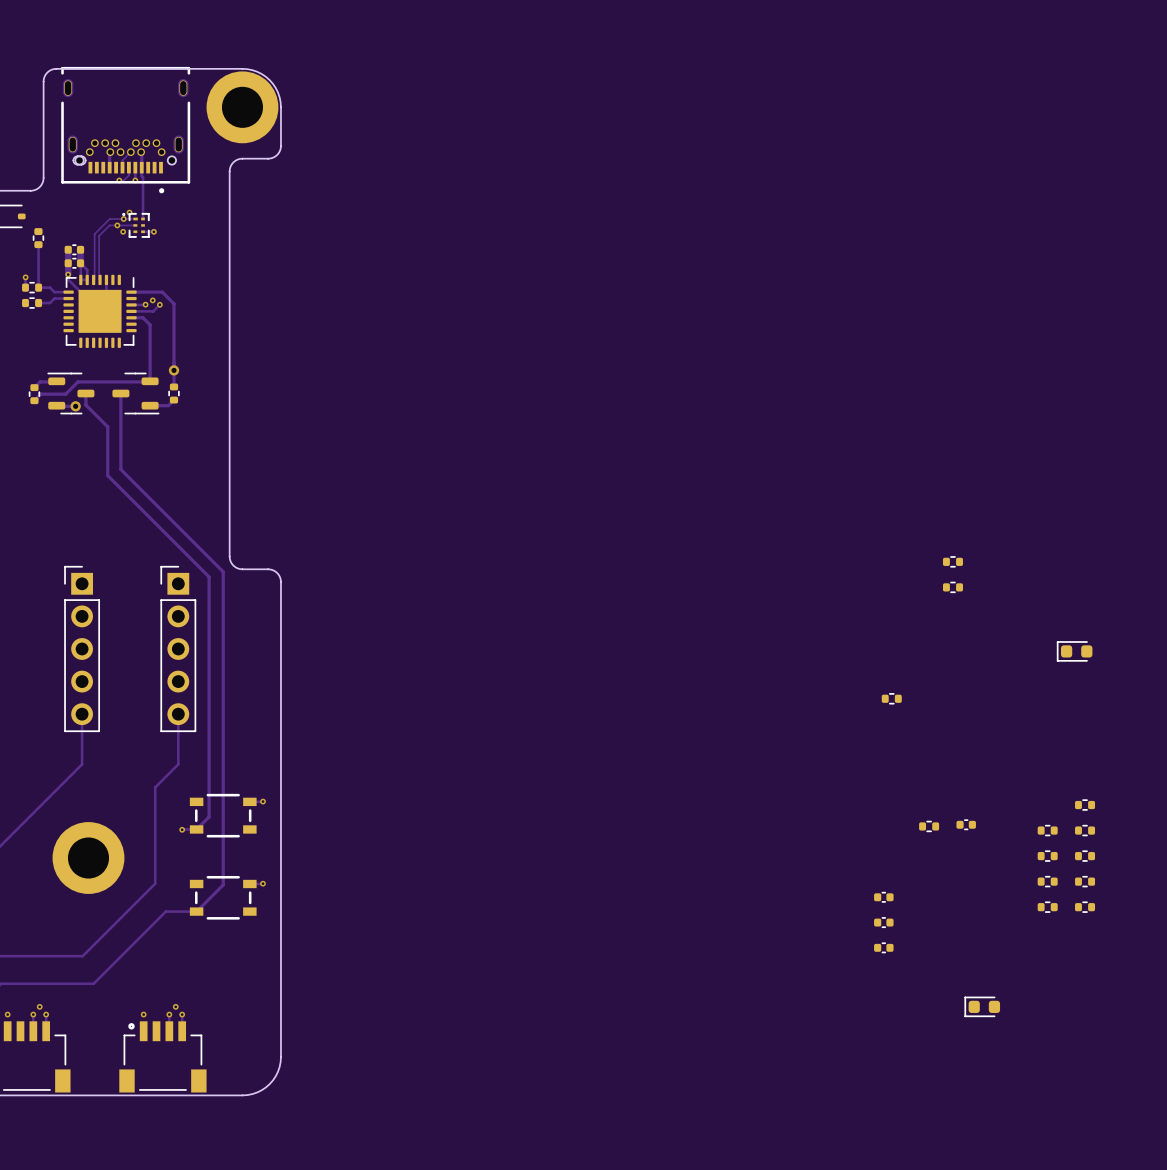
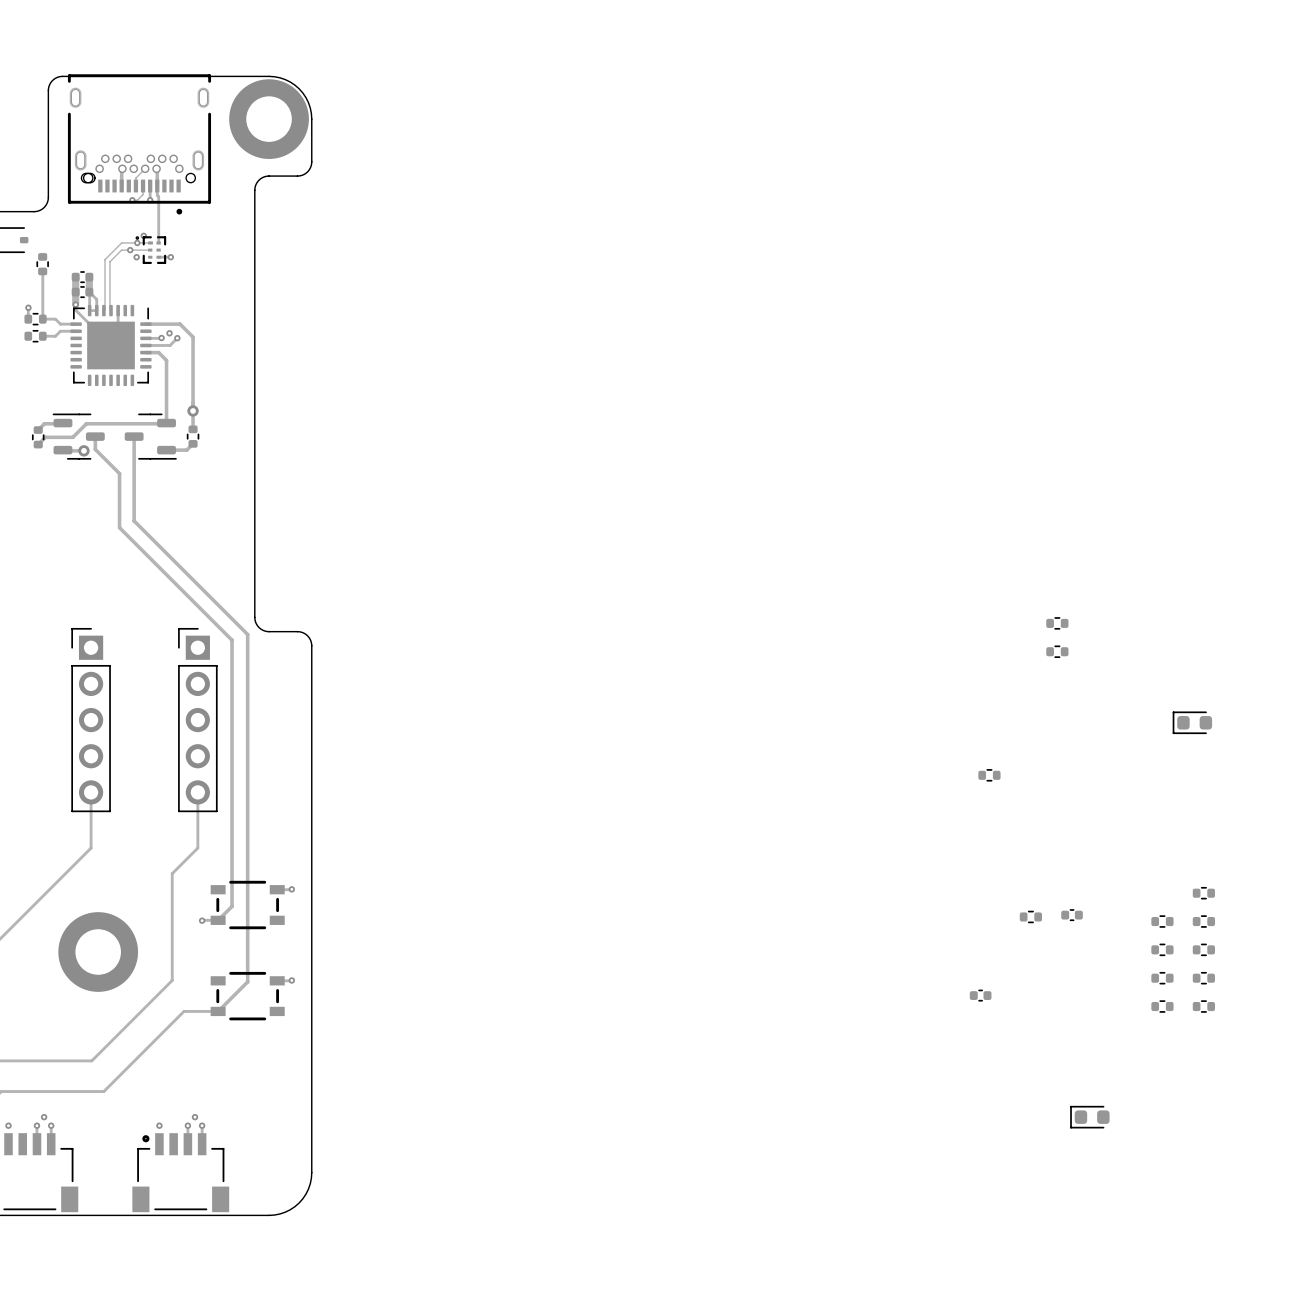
part: (883, 922) -> none
part: (883, 947) -> none

